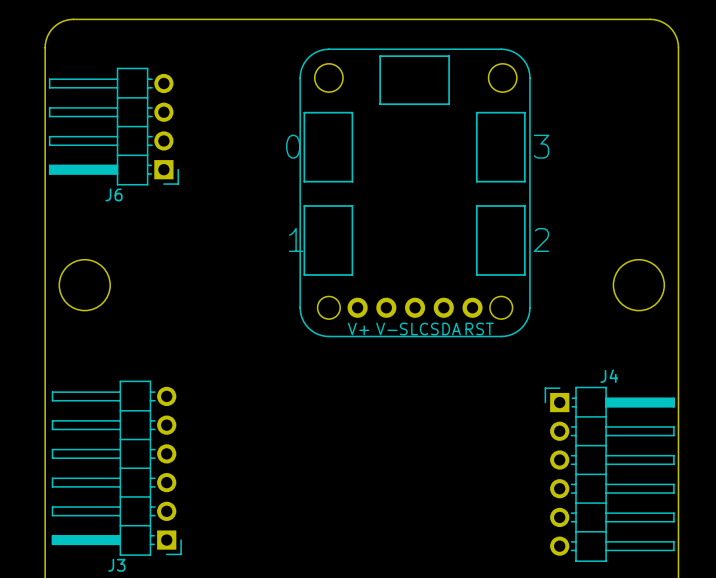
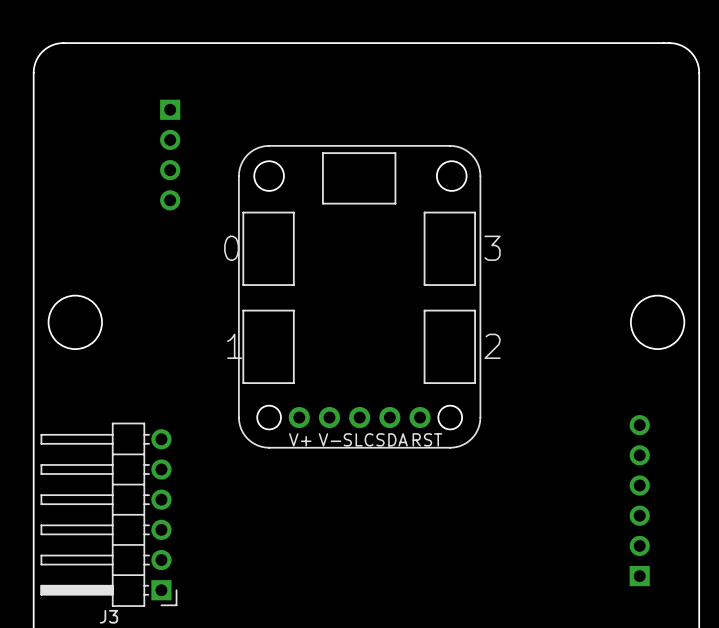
J6 side: top (113, 126) -> bottom (170, 155)
part position: (415, 192) -> (359, 296)
J4 side: top (609, 474) -> bottom (639, 500)

